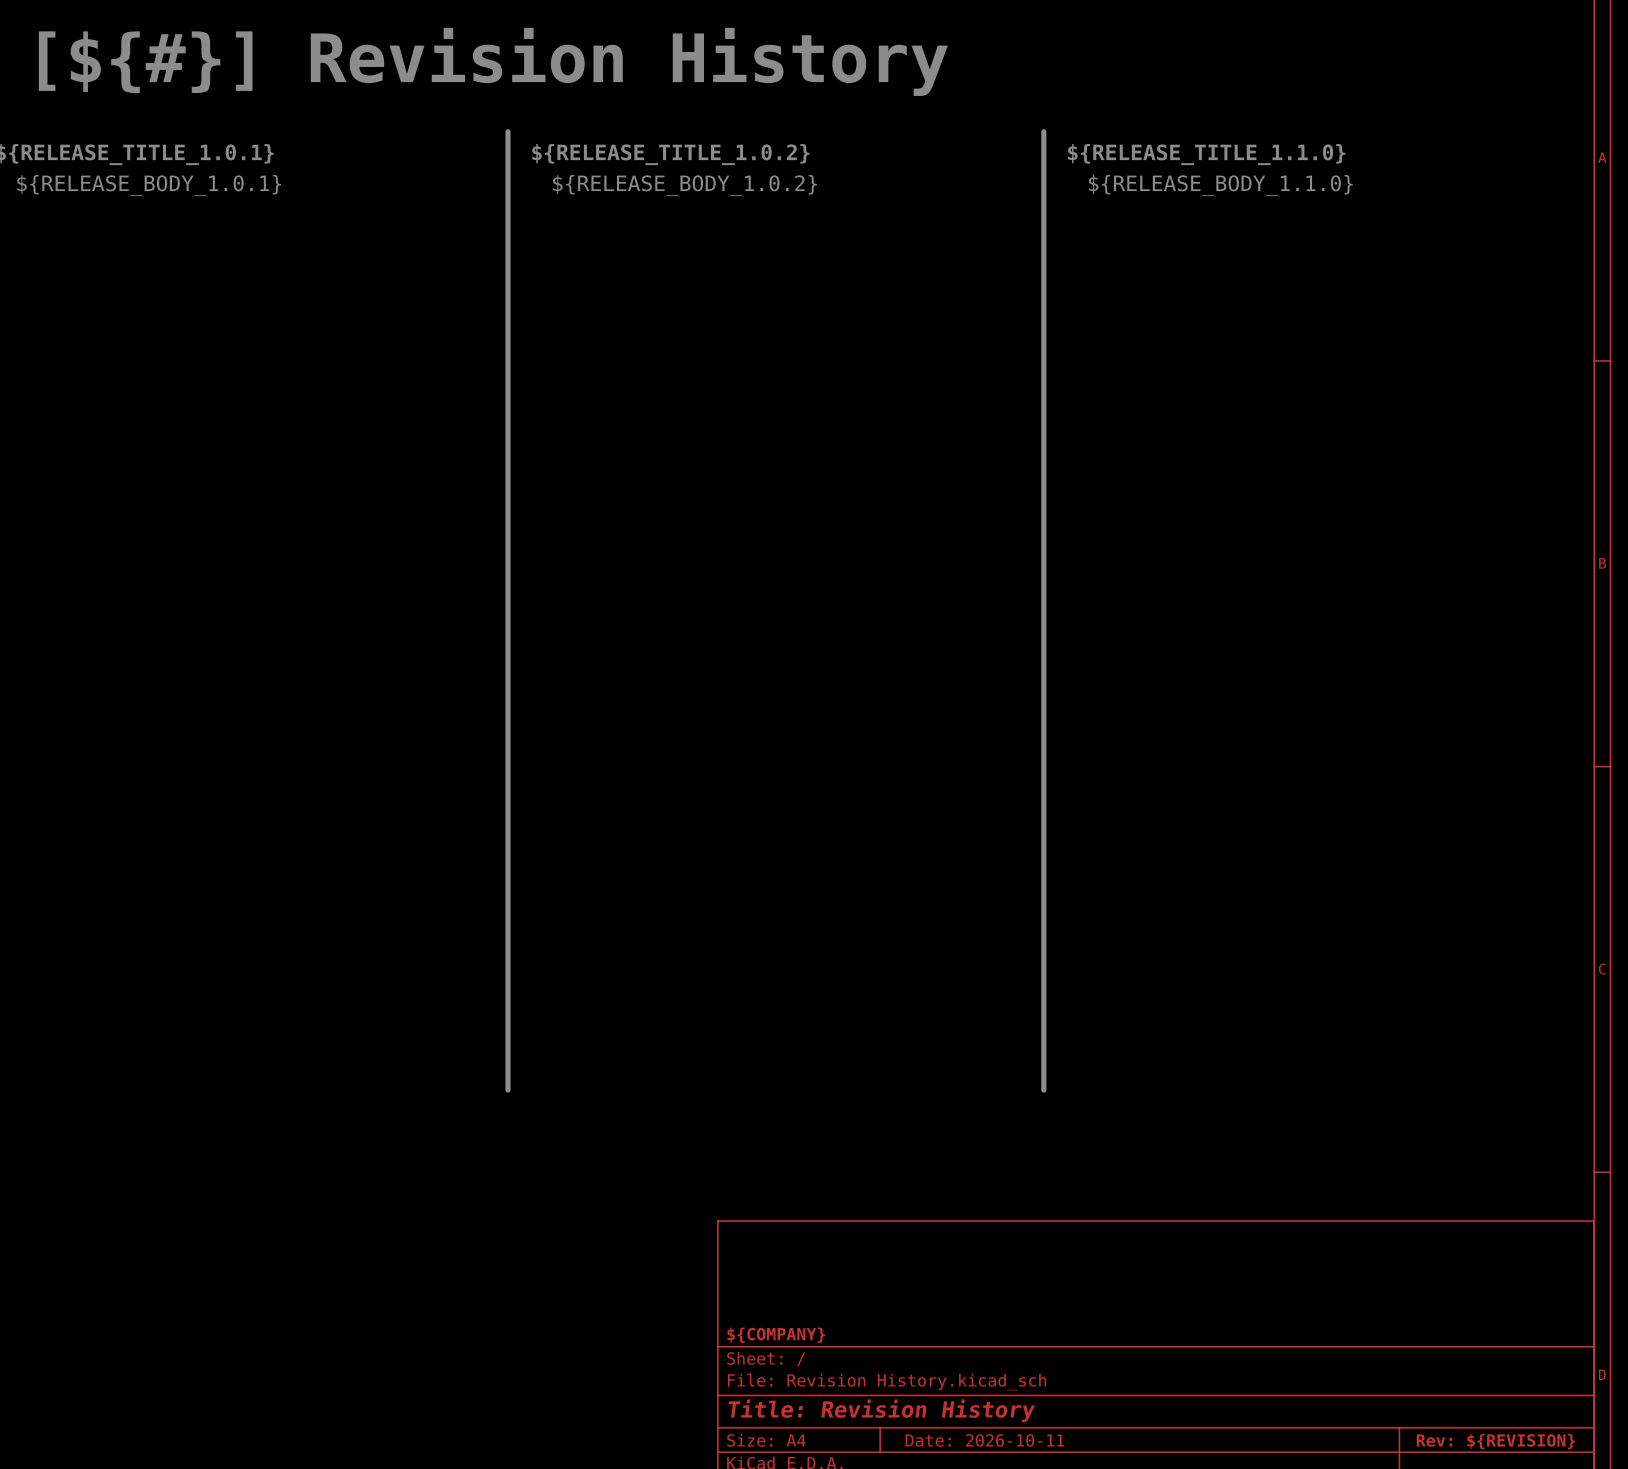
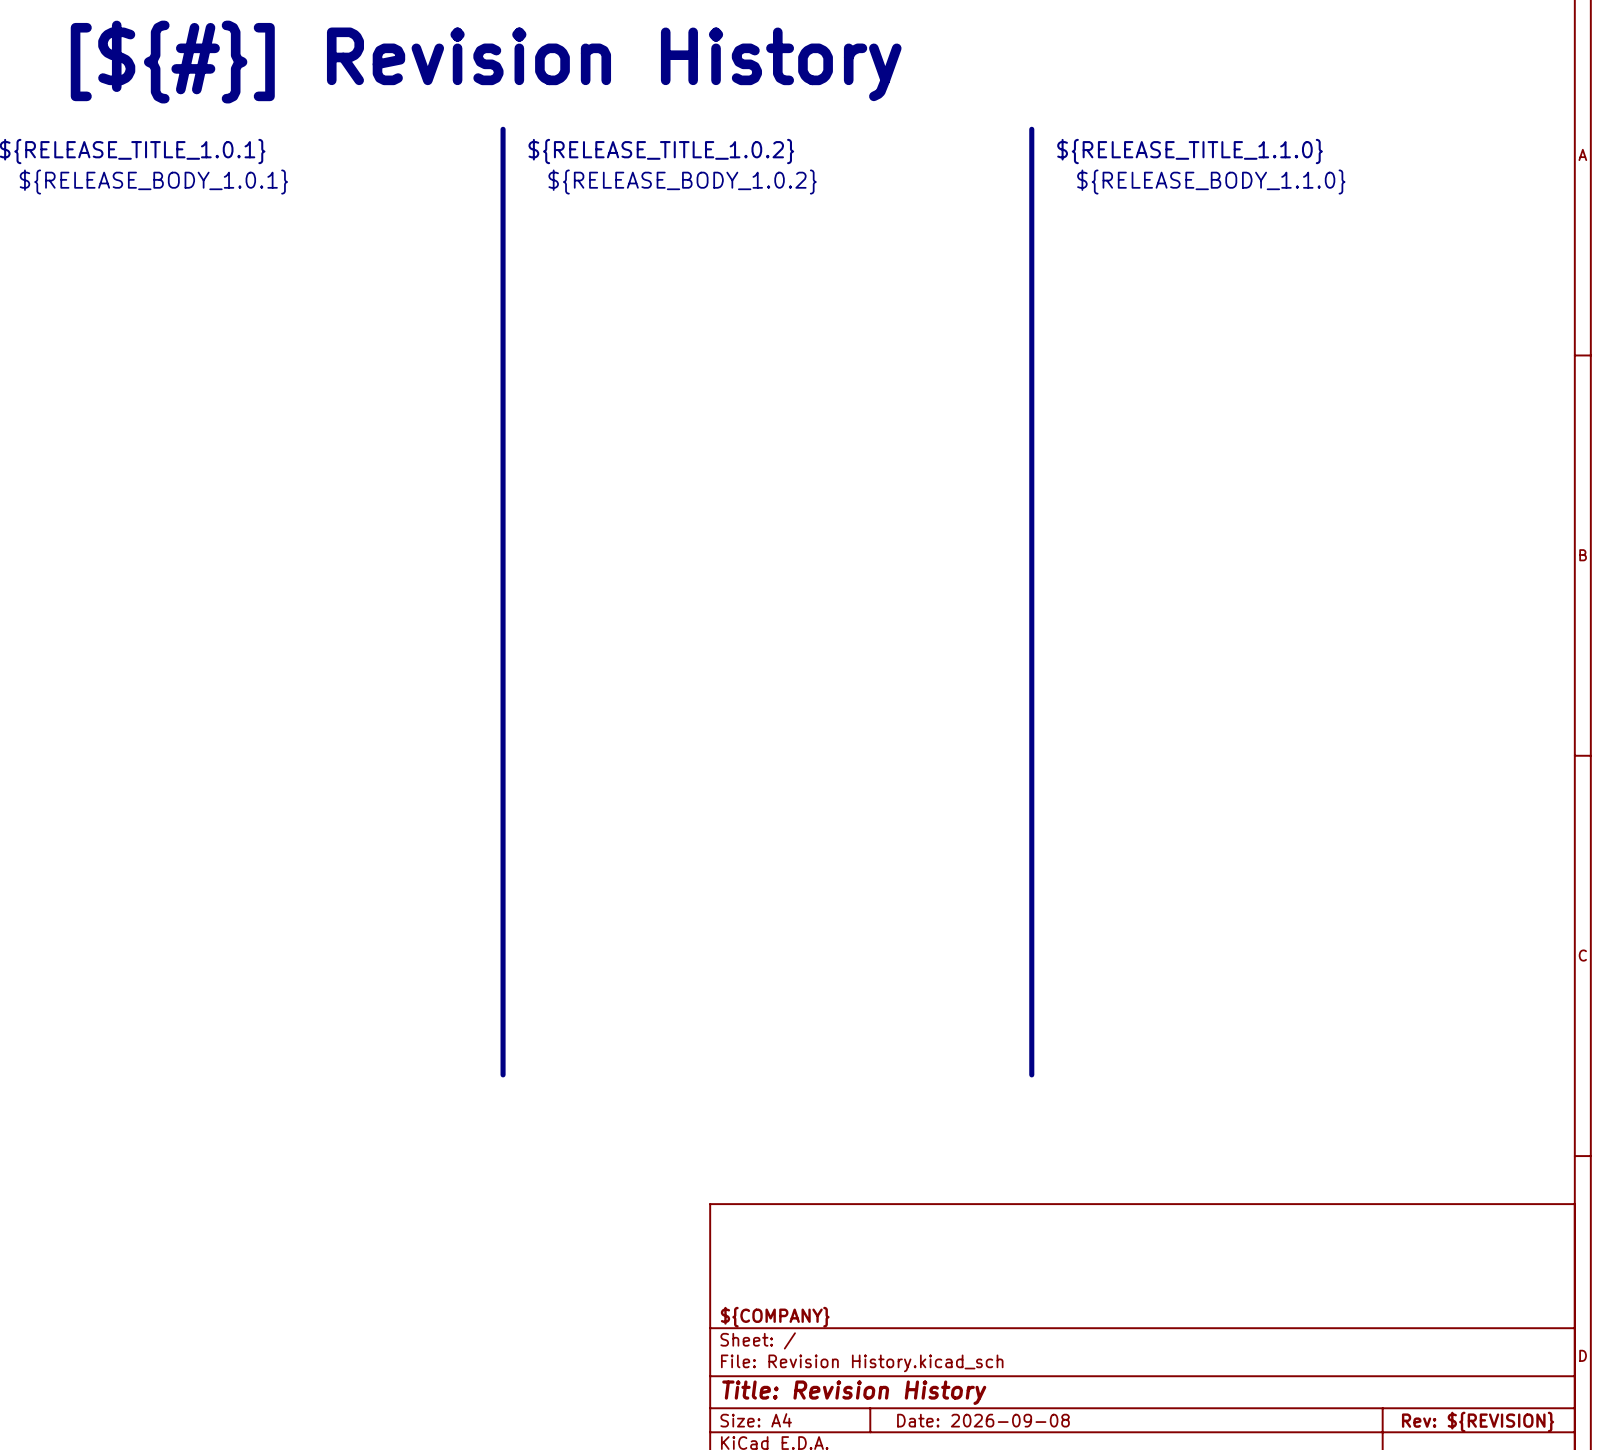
title block: Date: 2026-10-11 (984, 1440) -> Date: 2026-09-08 (983, 1420)

